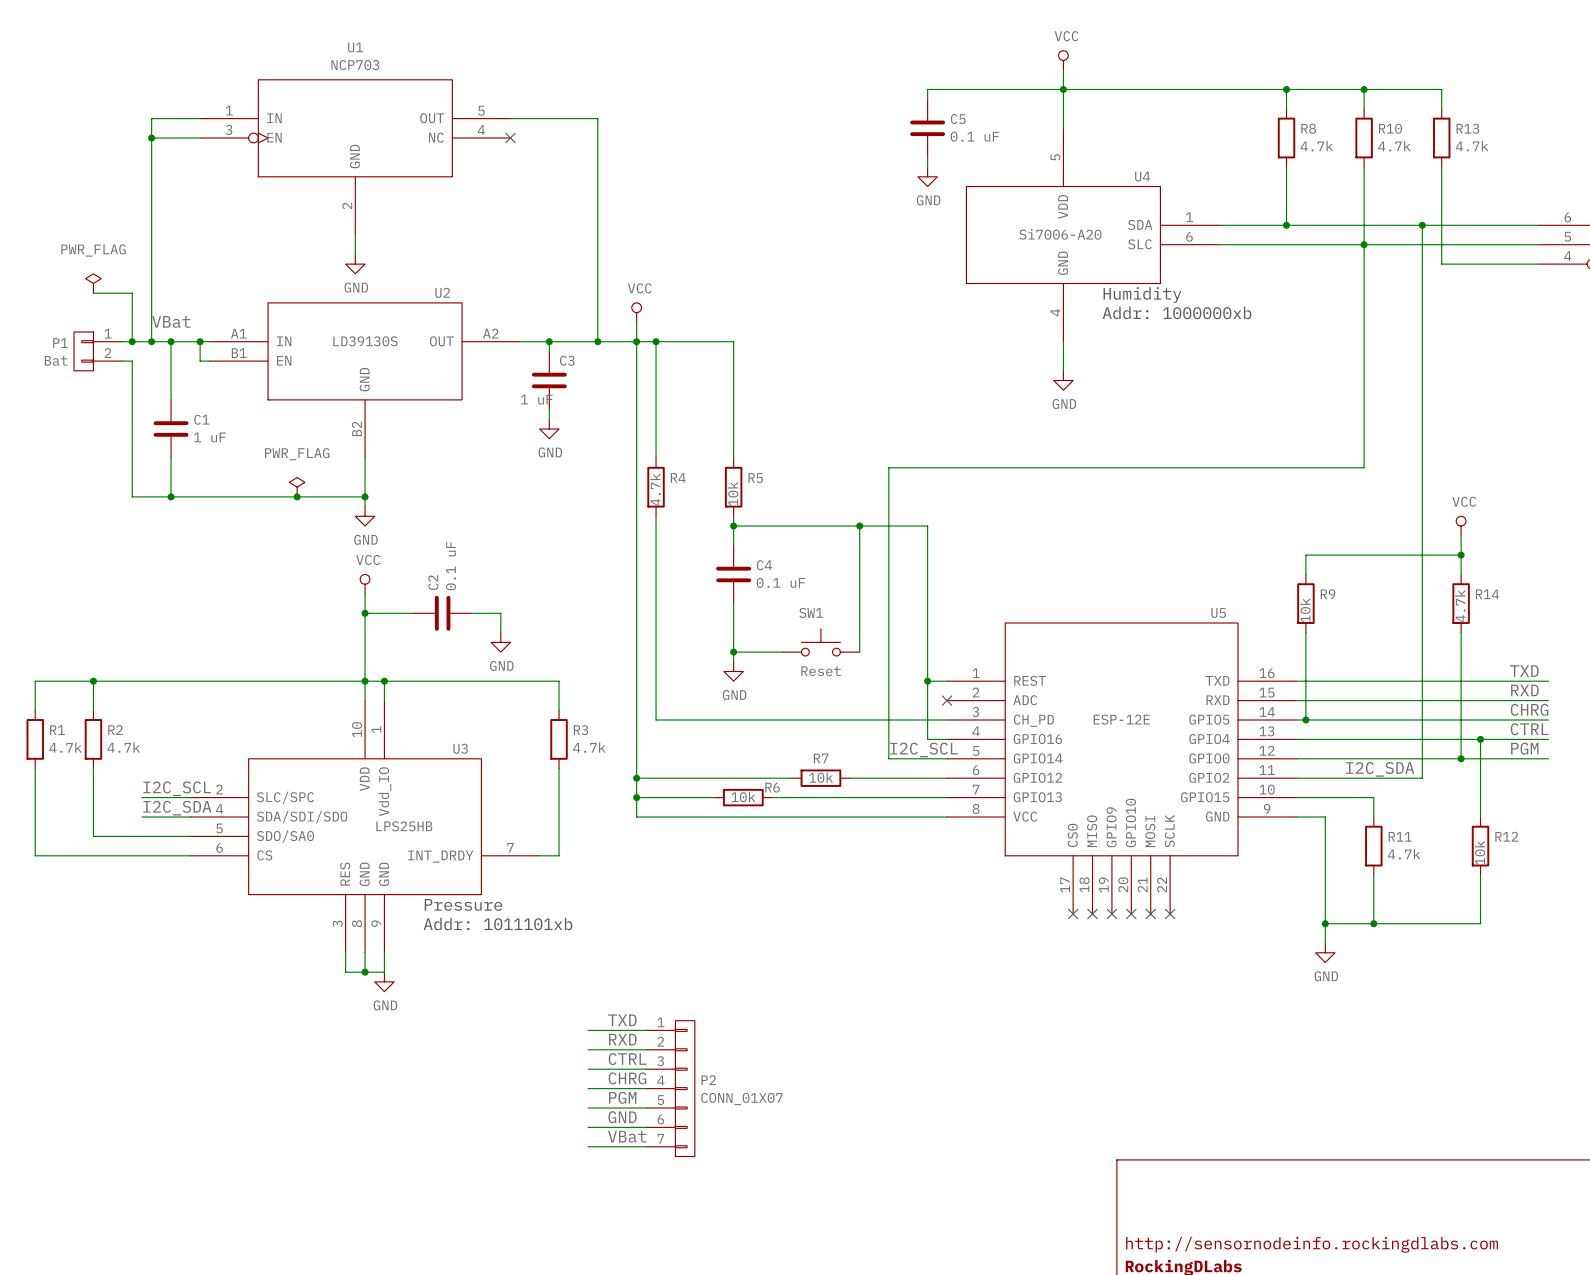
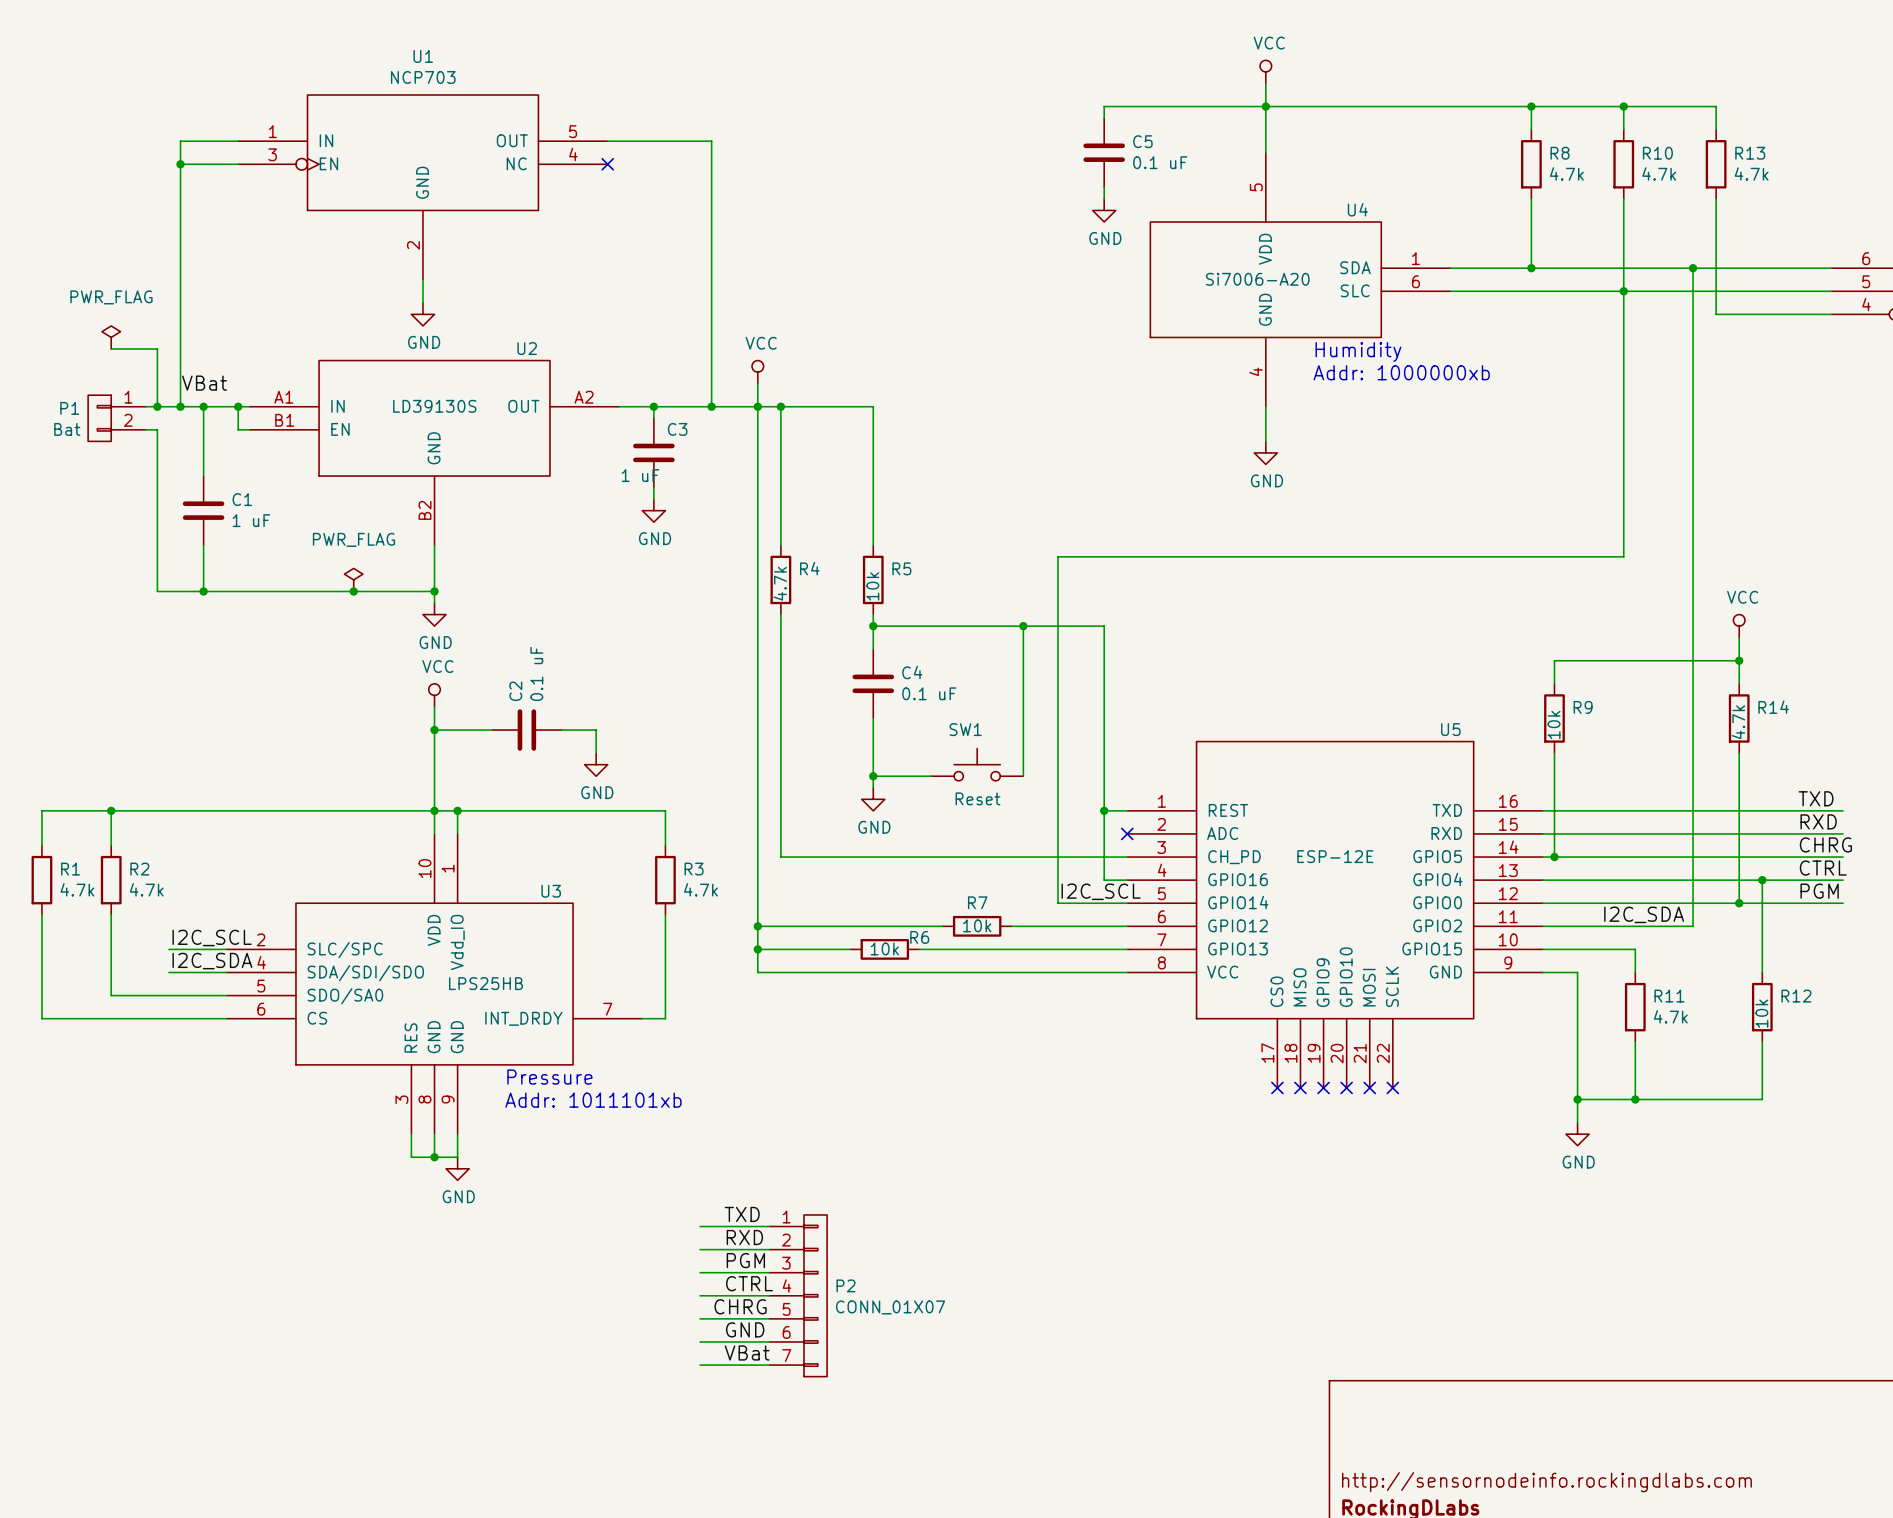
label: CTRL (627, 1059) -> PGM (745, 1260)
label: CHRG (627, 1078) -> CTRL (749, 1283)
label: none -> CHRG (740, 1306)
label: PGM (622, 1097) -> none

